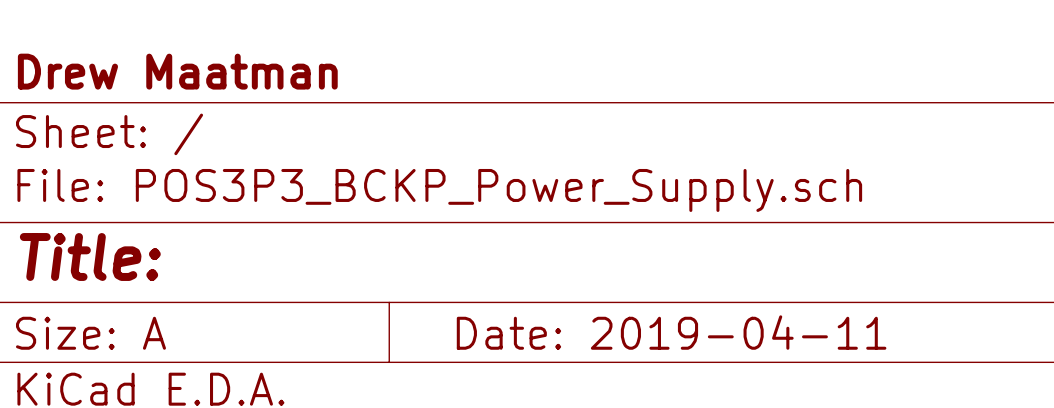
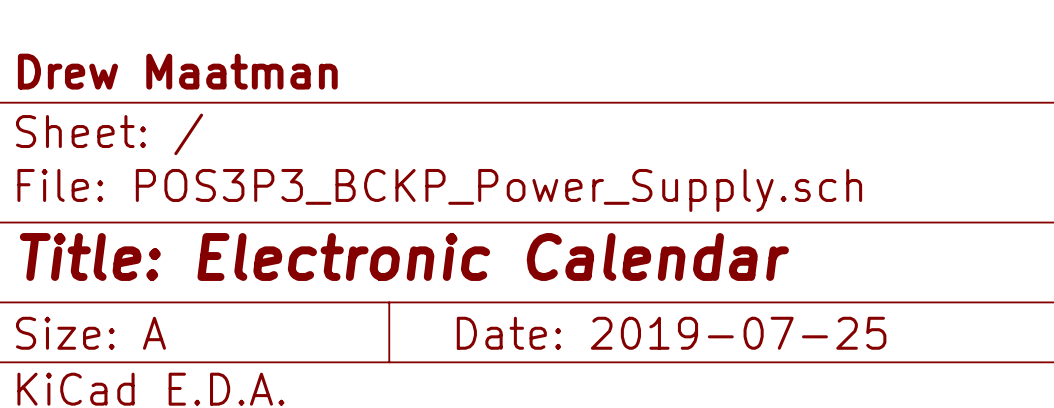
title block: Title: (90, 256) -> Title: Electronic Calendar (404, 256)
title block: Date: 2019-04-11 (671, 332) -> Date: 2019-07-25 (671, 333)

